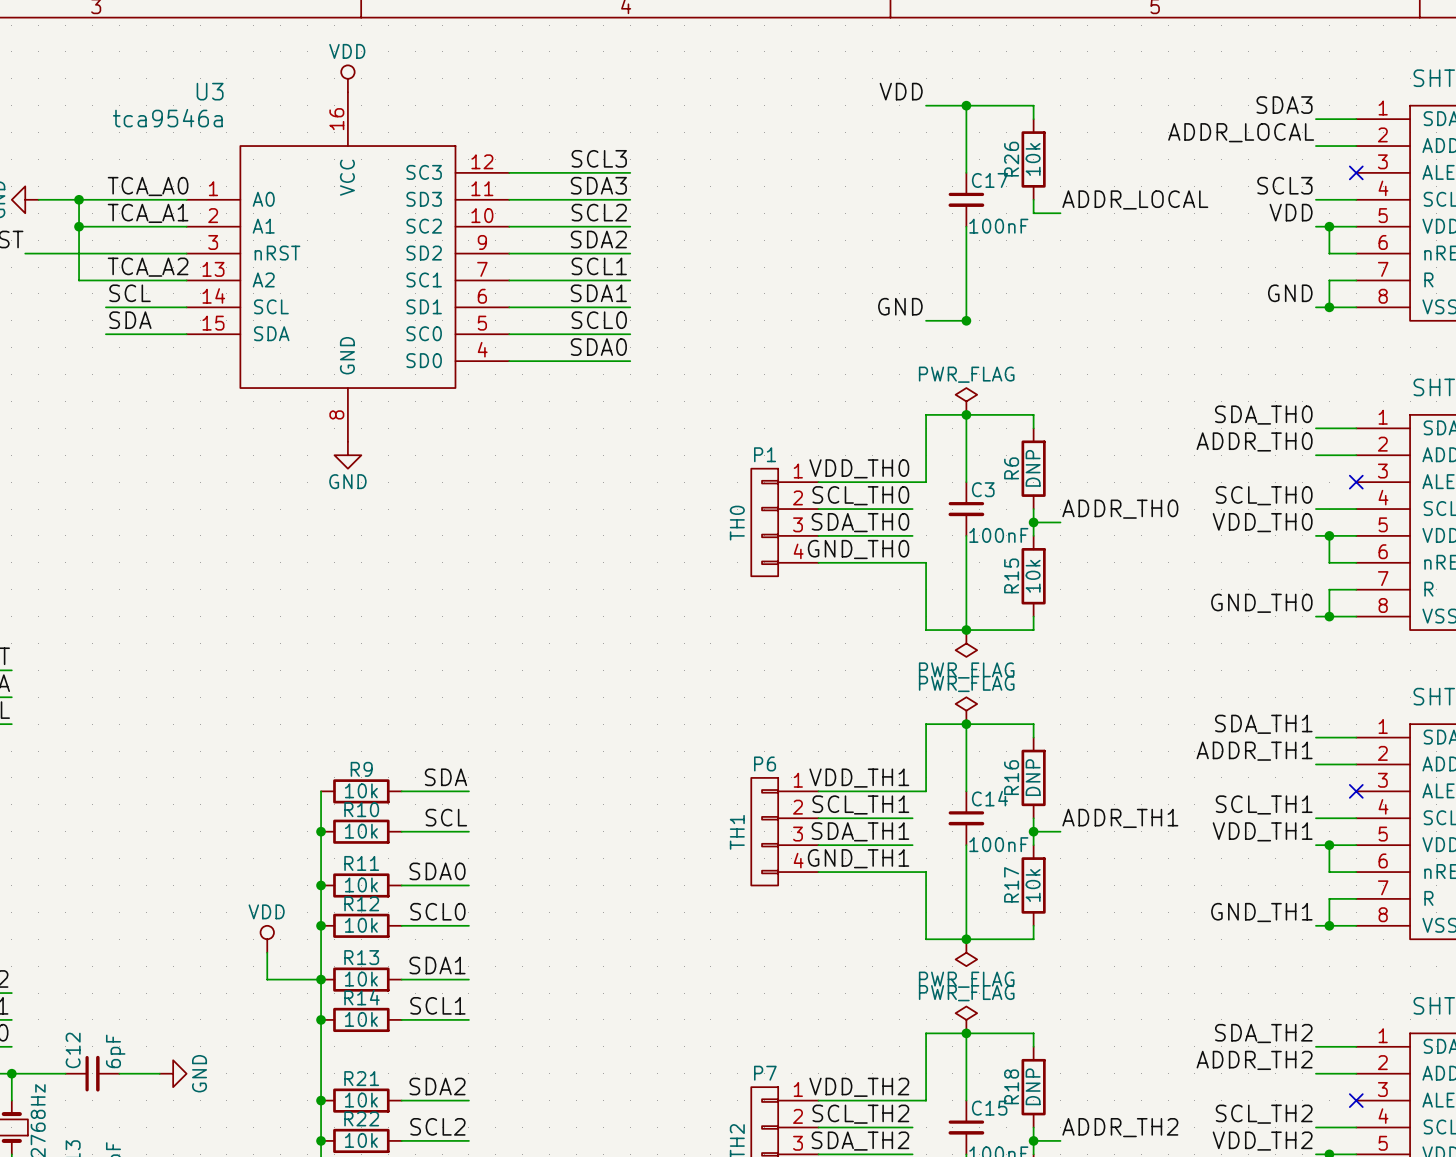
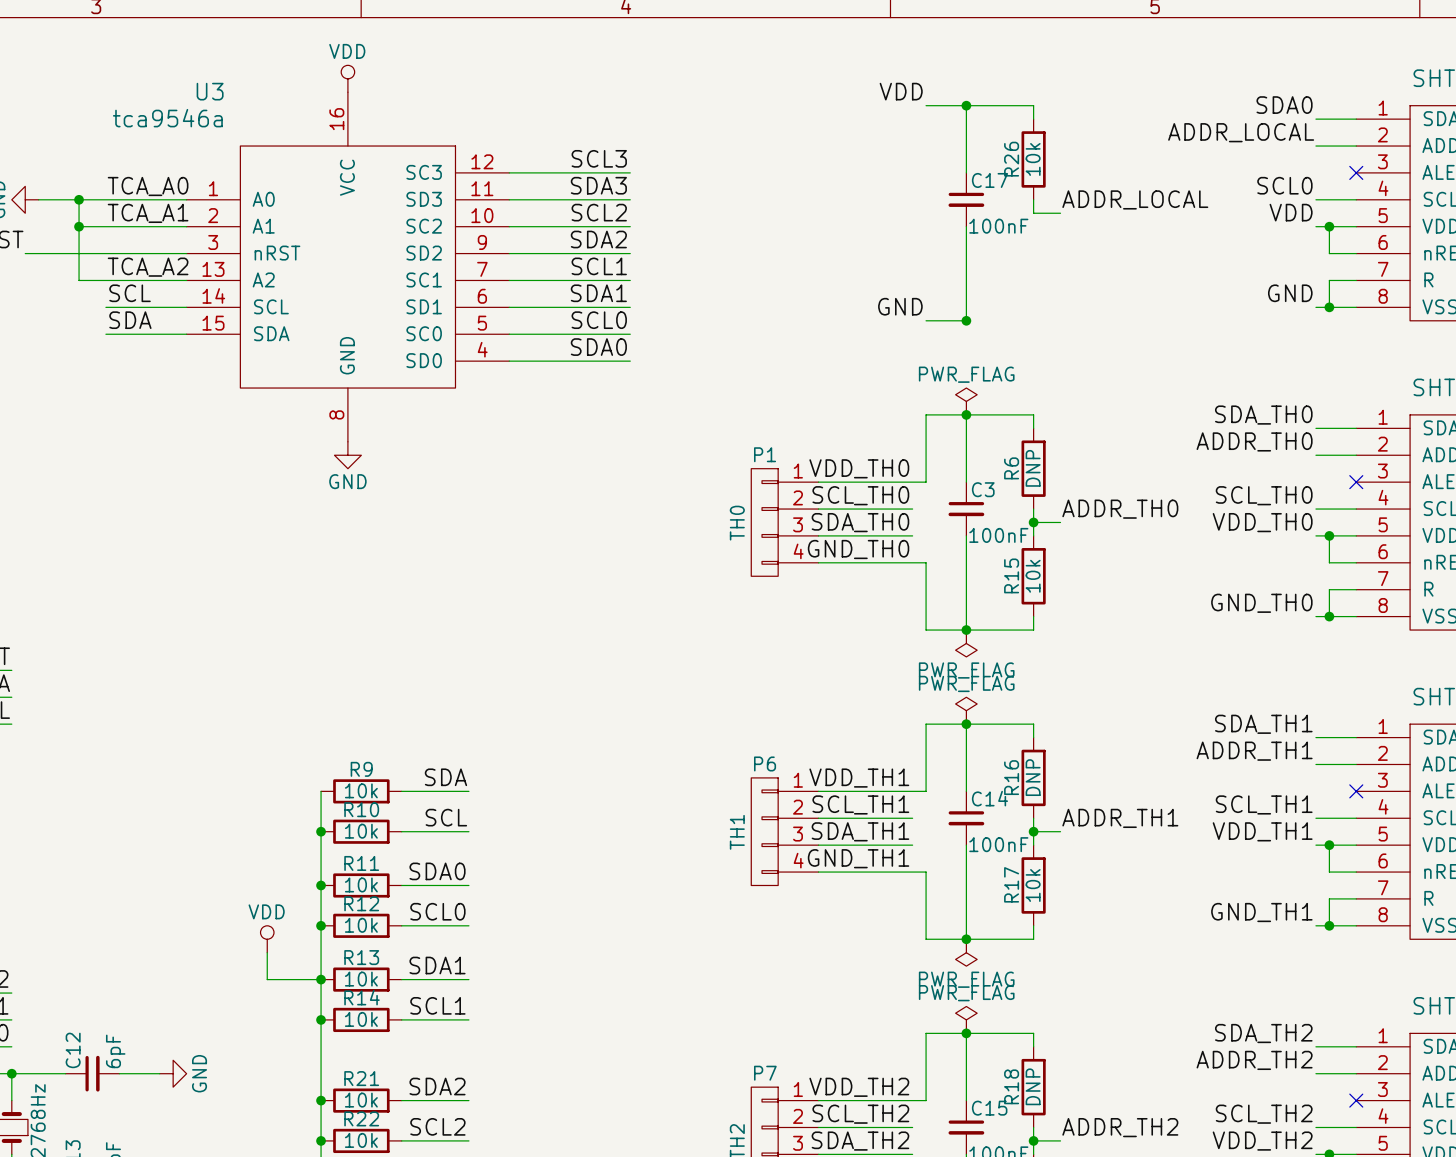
label: SDA3 (1284, 105) -> SDA0 (1284, 105)
label: SCL3 (1284, 185) -> SCL0 (1284, 185)

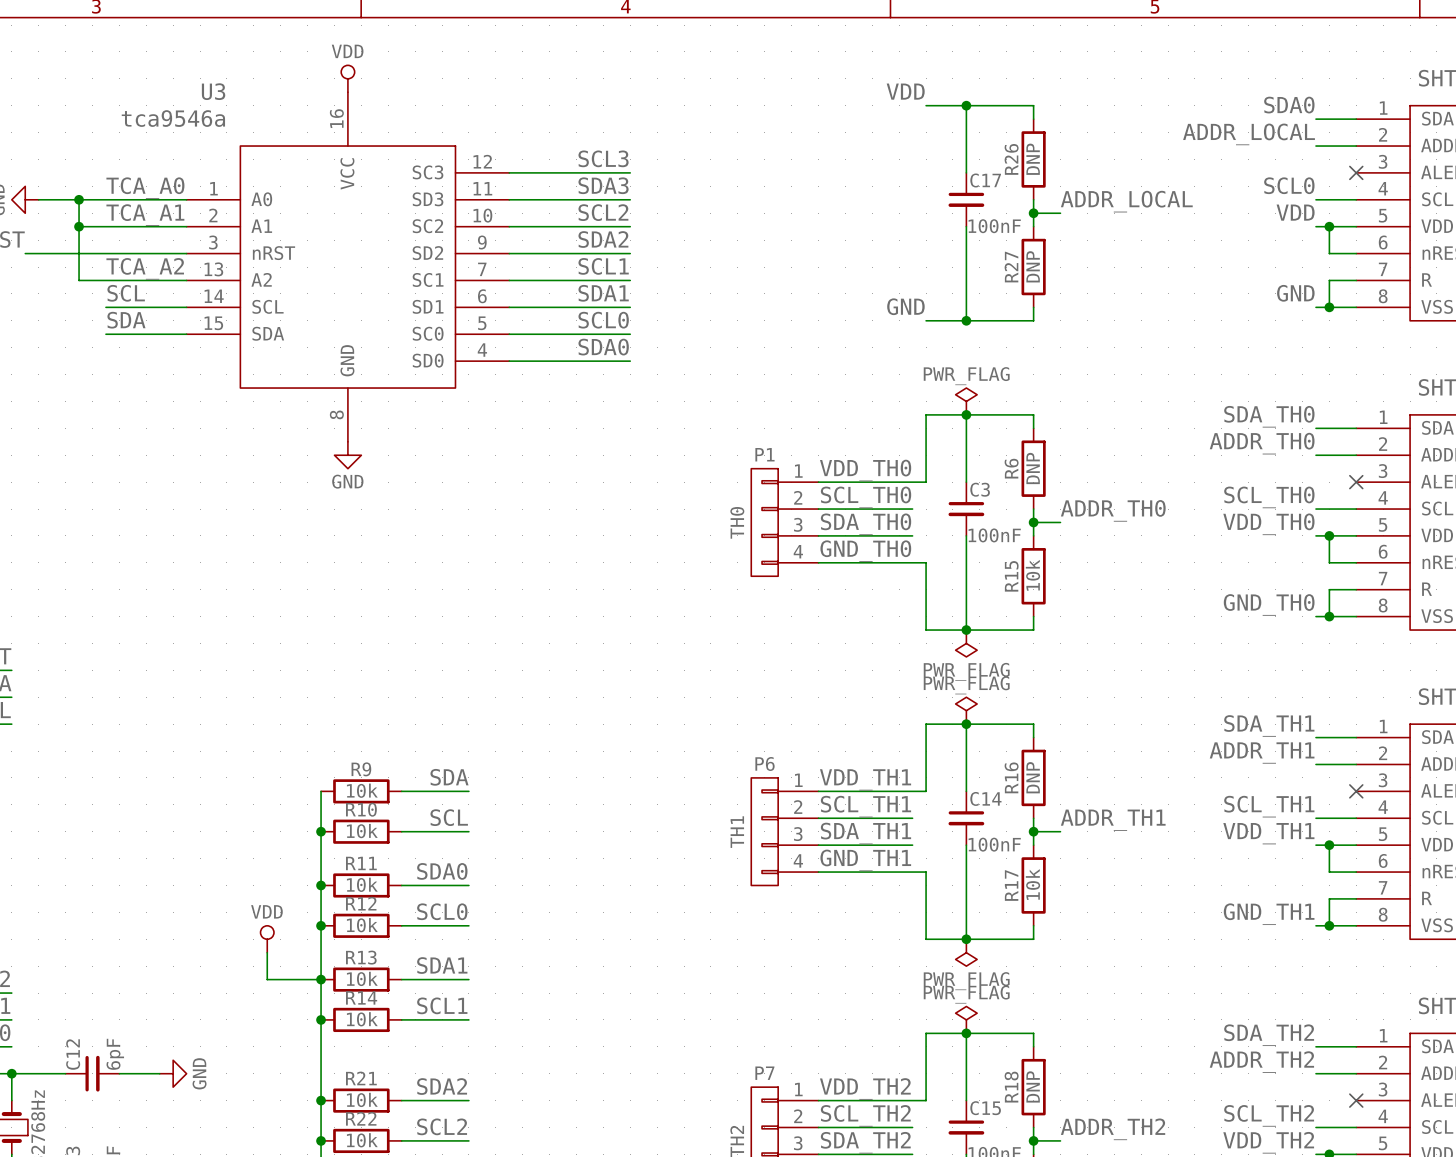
R26 value: 10k (1033, 159) -> DNP (1033, 159)
wire: none -> (1033, 213) (1033, 226)
junction: none -> (1033, 213)
R27: none -> DNP (1033, 267)
wire: none -> (1033, 307) (1033, 320) (966, 320)

